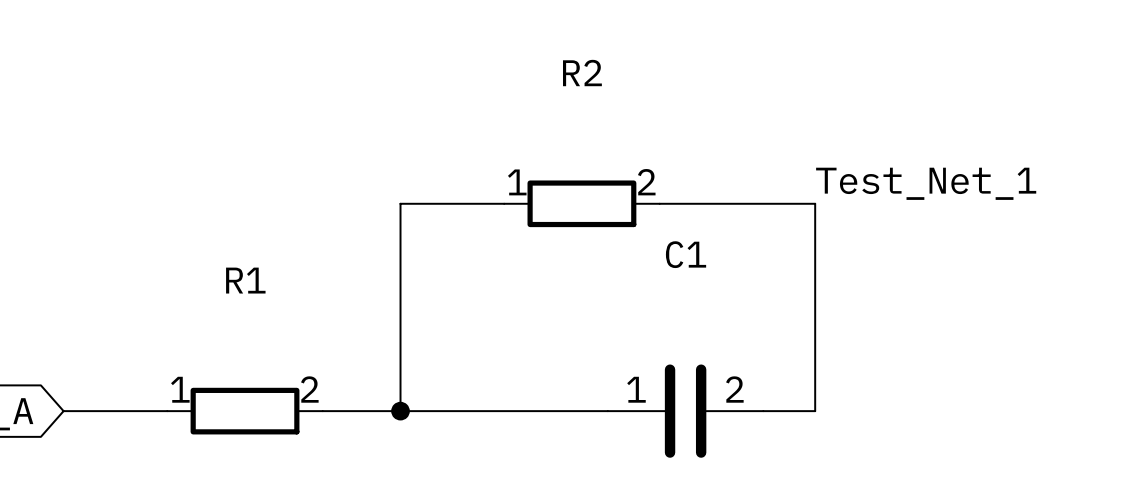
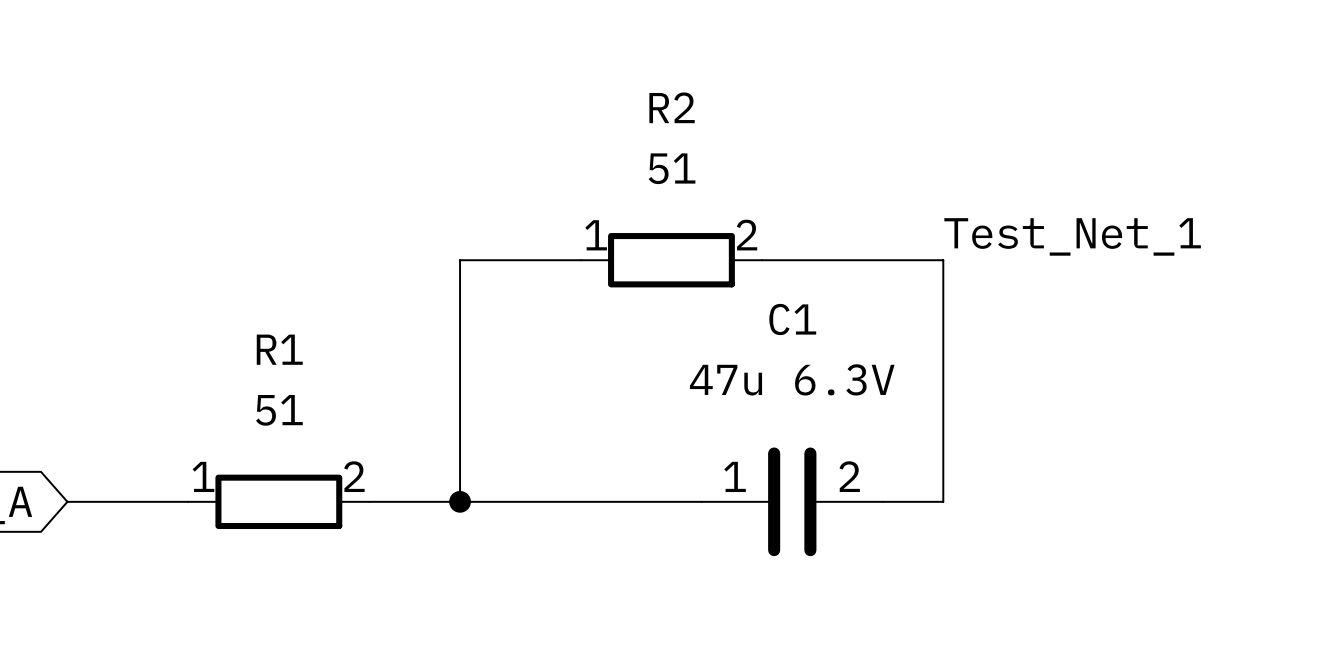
R2 value: none -> 51 (672, 168)
C1 value: none -> 47u 6.3V (792, 379)
R1 value: none -> 51 (279, 410)

